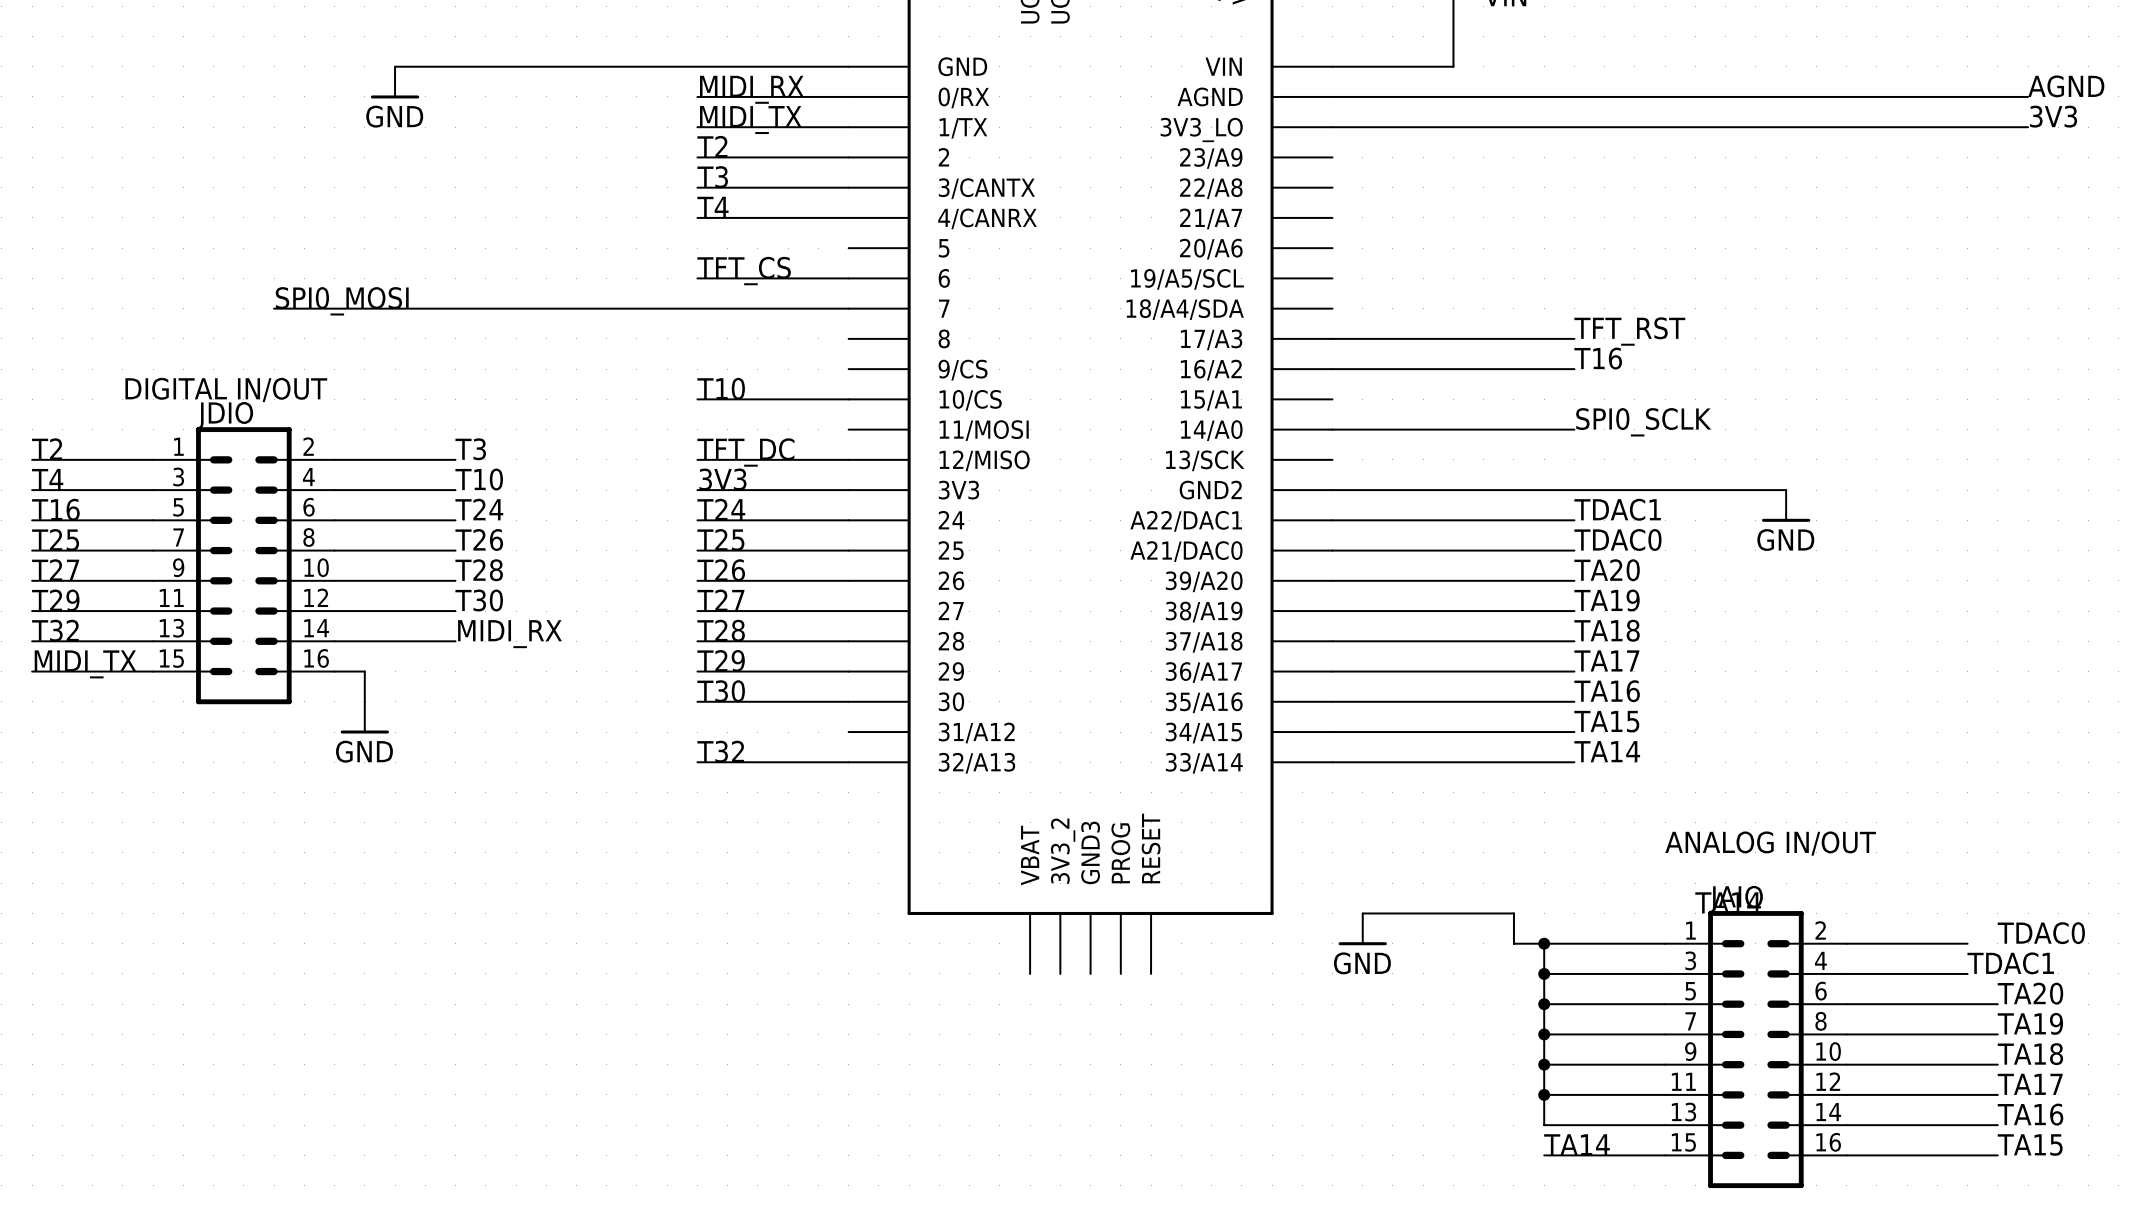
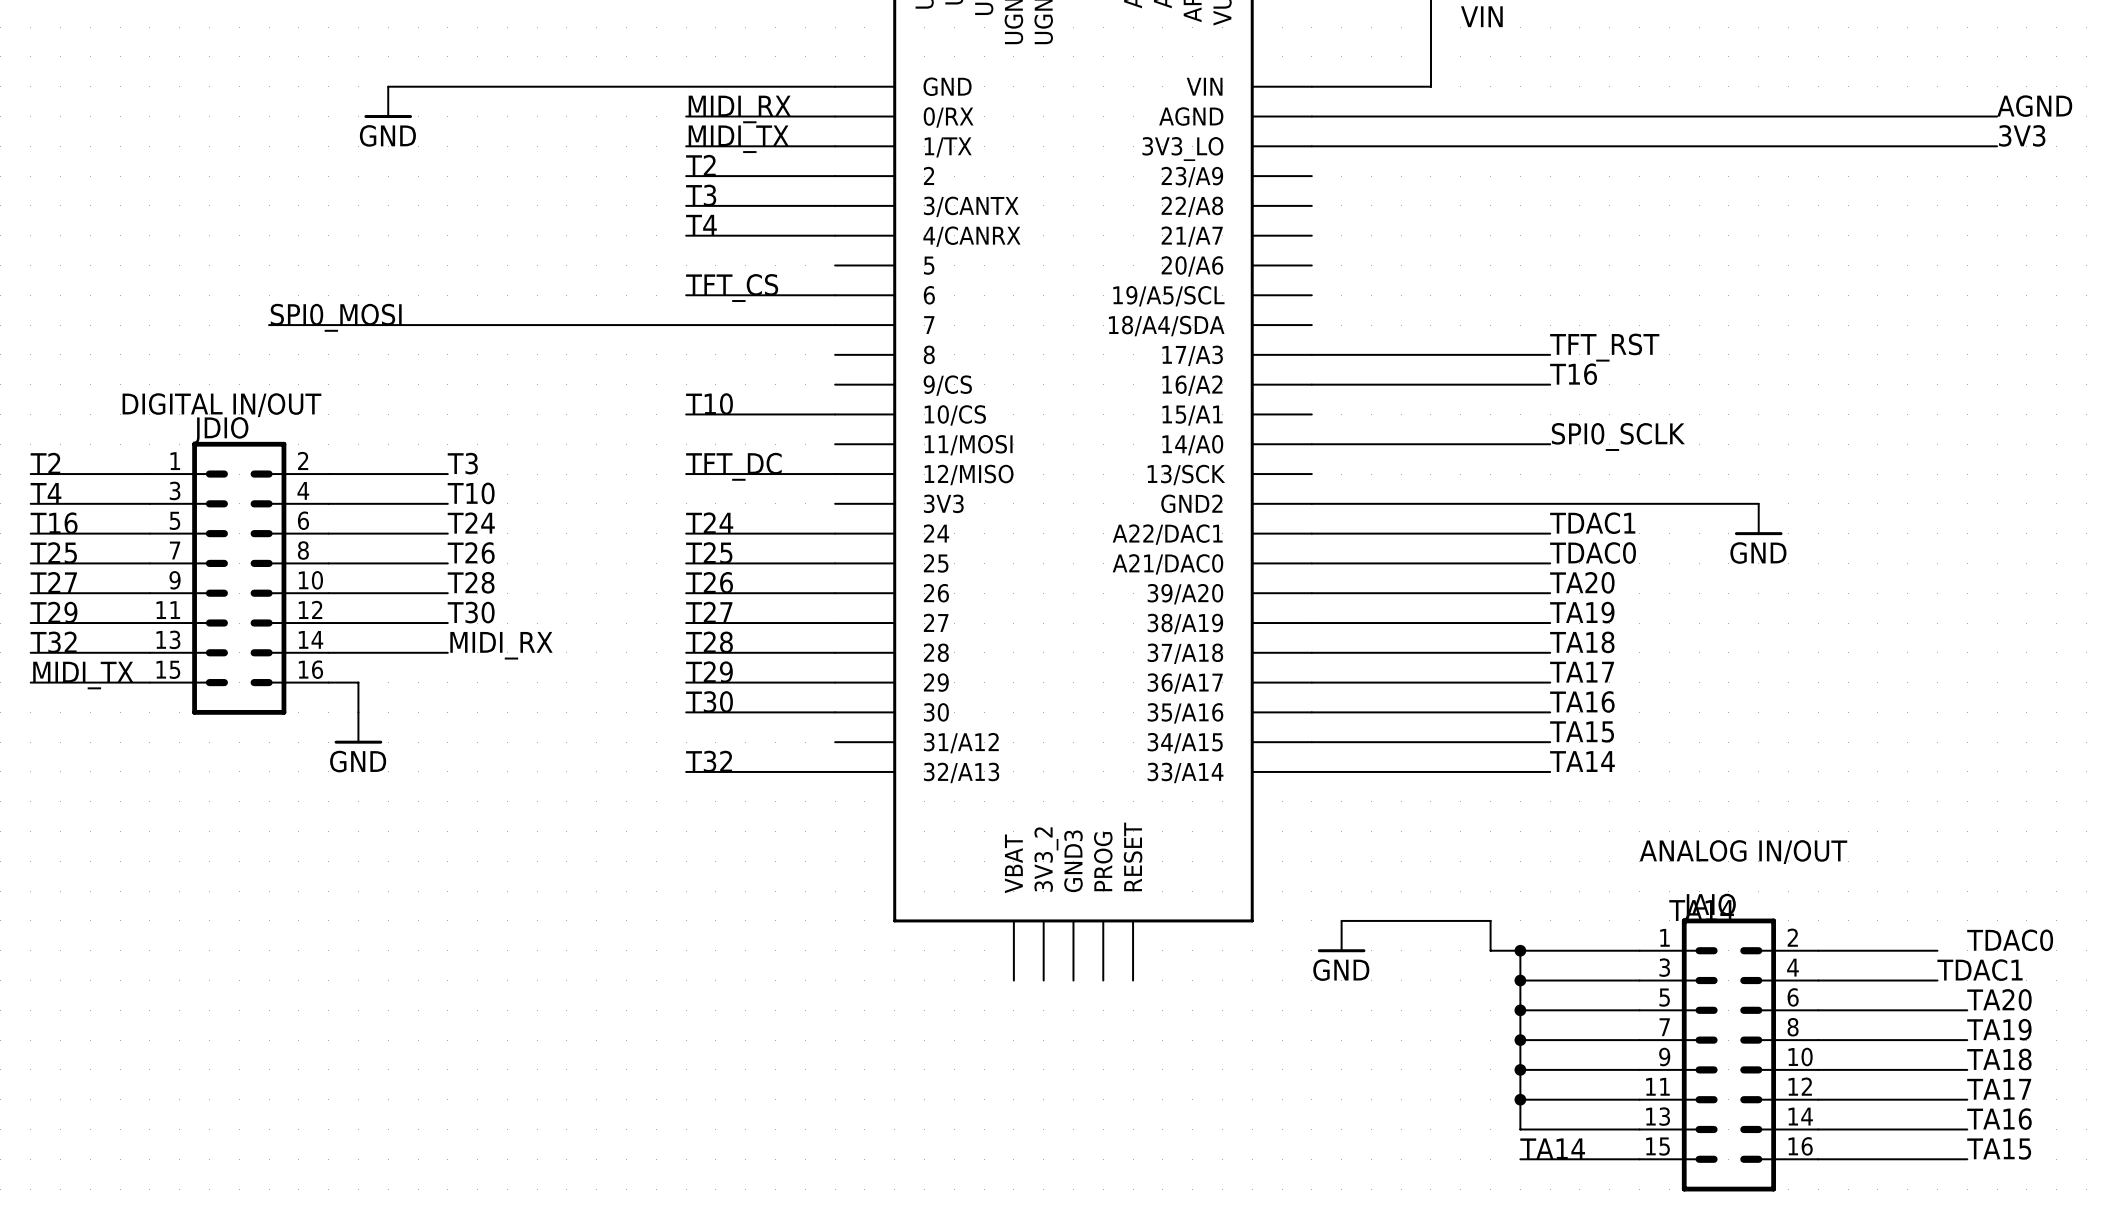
label: 3V3 (722, 479) -> none
wire: (697, 490) (848, 490) -> none

